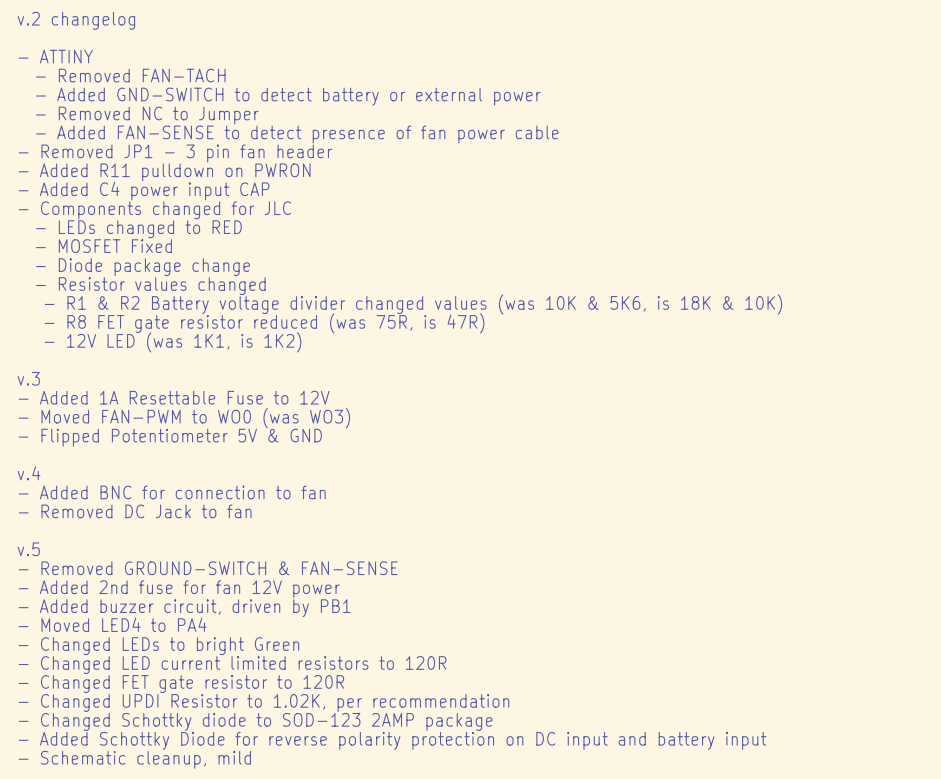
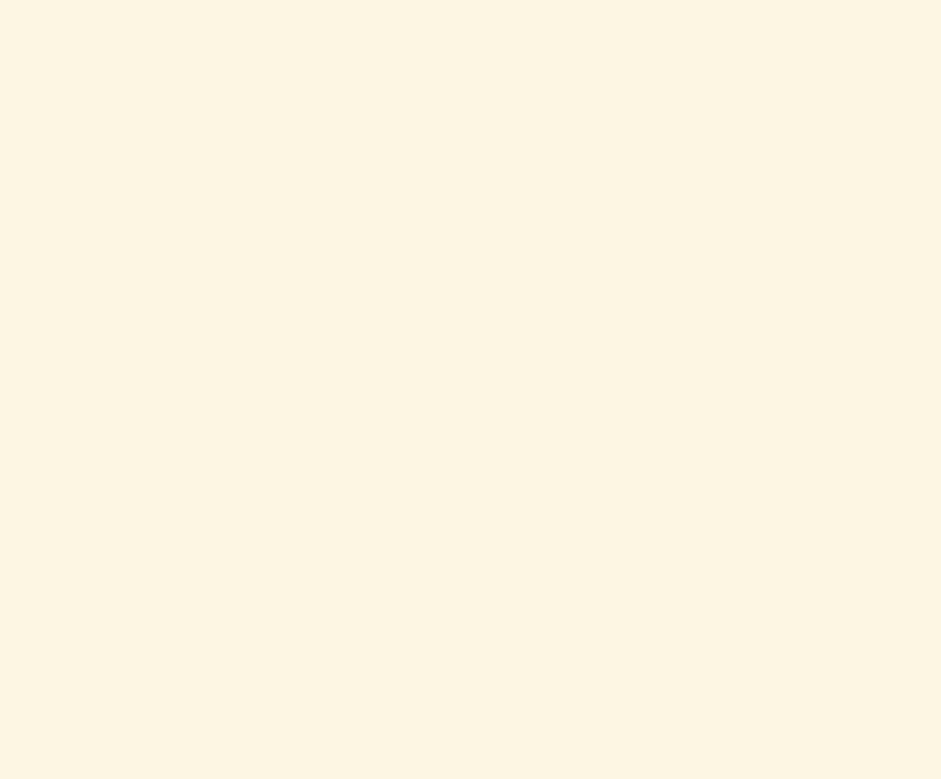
text: v.2 changelog (76, 20) -> none
text: - ATTINY (55, 56) -> none
text: - Removed FAN-TACH (130, 75) -> none
text: - Added GND-SWITCH to detect battery or external power (288, 96) -> none
text: - Removed NC to Jumper (147, 115) -> none
text: - Added FAN-SENSE to detect presence of fan power cable (297, 134) -> none
text: - Removed JP1 - 3 pin fan header (175, 153) -> none
text: - Added R11 pulldown on PWRON (164, 172) -> none
text: - Added C4 power input CAP (144, 191) -> none
text: - Components changed for JLC (154, 210) -> none
text: - LEDs changed to RED (138, 229) -> none
text: - MOSFET Fixed (104, 246) -> none
text: - Diode package change (143, 267) -> none
text: - Resistor values changed (150, 286) -> none
text: - R1 & R2 Battery voltage divider changed values (was 10K & 5K6, is 18K & 10K) (413, 304) -> none
text: - R8 FET gate resistor reduced (was 75R, is 47R) (264, 323) -> none
text: - 12V LED (was 1K1, is 1K2) (173, 342) -> none
text: v.3 (28, 378) -> none
text: - Added 1A Resettable Fuse to 12V (174, 397) -> none
text: - Moved FAN-PWM to WO0 (was WO3) (184, 418) -> none
text: - Flipped Potentiometer 5V & GND (170, 437) -> none
text: v.4 (29, 473) -> none
text: - Added BNC for connection to fan (172, 492) -> none
text: - Removed DC Jack to fan (135, 511) -> none
text: v.5 (28, 549) -> none
text: - Removed GROUND-SWITCH & FAN-SENSE (208, 568) -> none
text: - Added 2nd fuse for fan 12V power (179, 589) -> none
text: - Added buzzer circuit, driven by PB1 (184, 608) -> none
text: - Moved LED4 to PA4 (112, 624) -> none
text: - Changed LEDs to bright Green (158, 646) -> none
text: - Changed LED current limited resistors to 120R (232, 665) -> none
text: - Changed FET gate resistor to 120R (181, 684) -> none
text: - Changed UPDI Resistor to 1.02K, per recommendation (264, 703) -> none
text: - Changed Schottky diode to SOD-123 2AMP package (255, 721) -> none
text: - Added Schottky Diode for reverse polarity protection on DC input and battery input (392, 740) -> none
text: - Schematic cleanup, mild (134, 759) -> none

